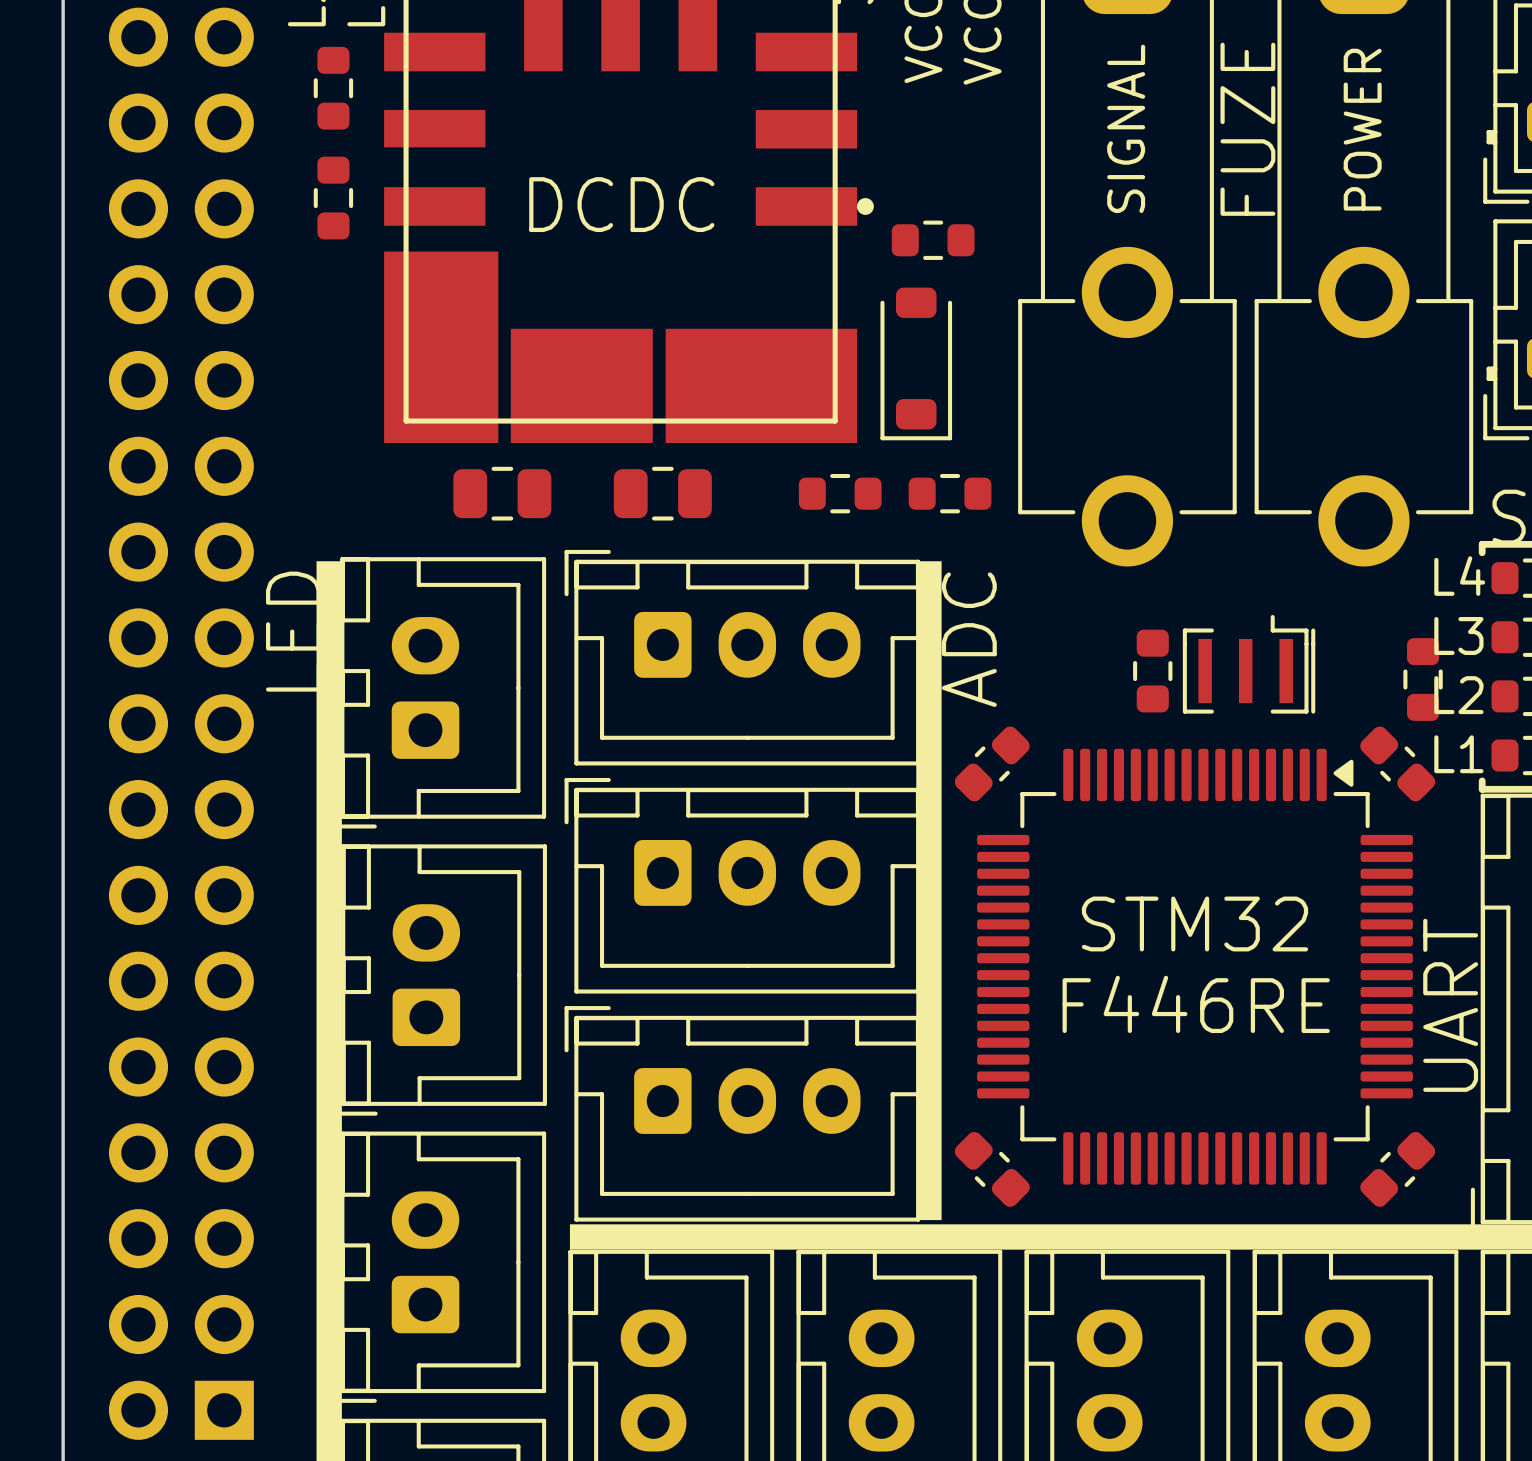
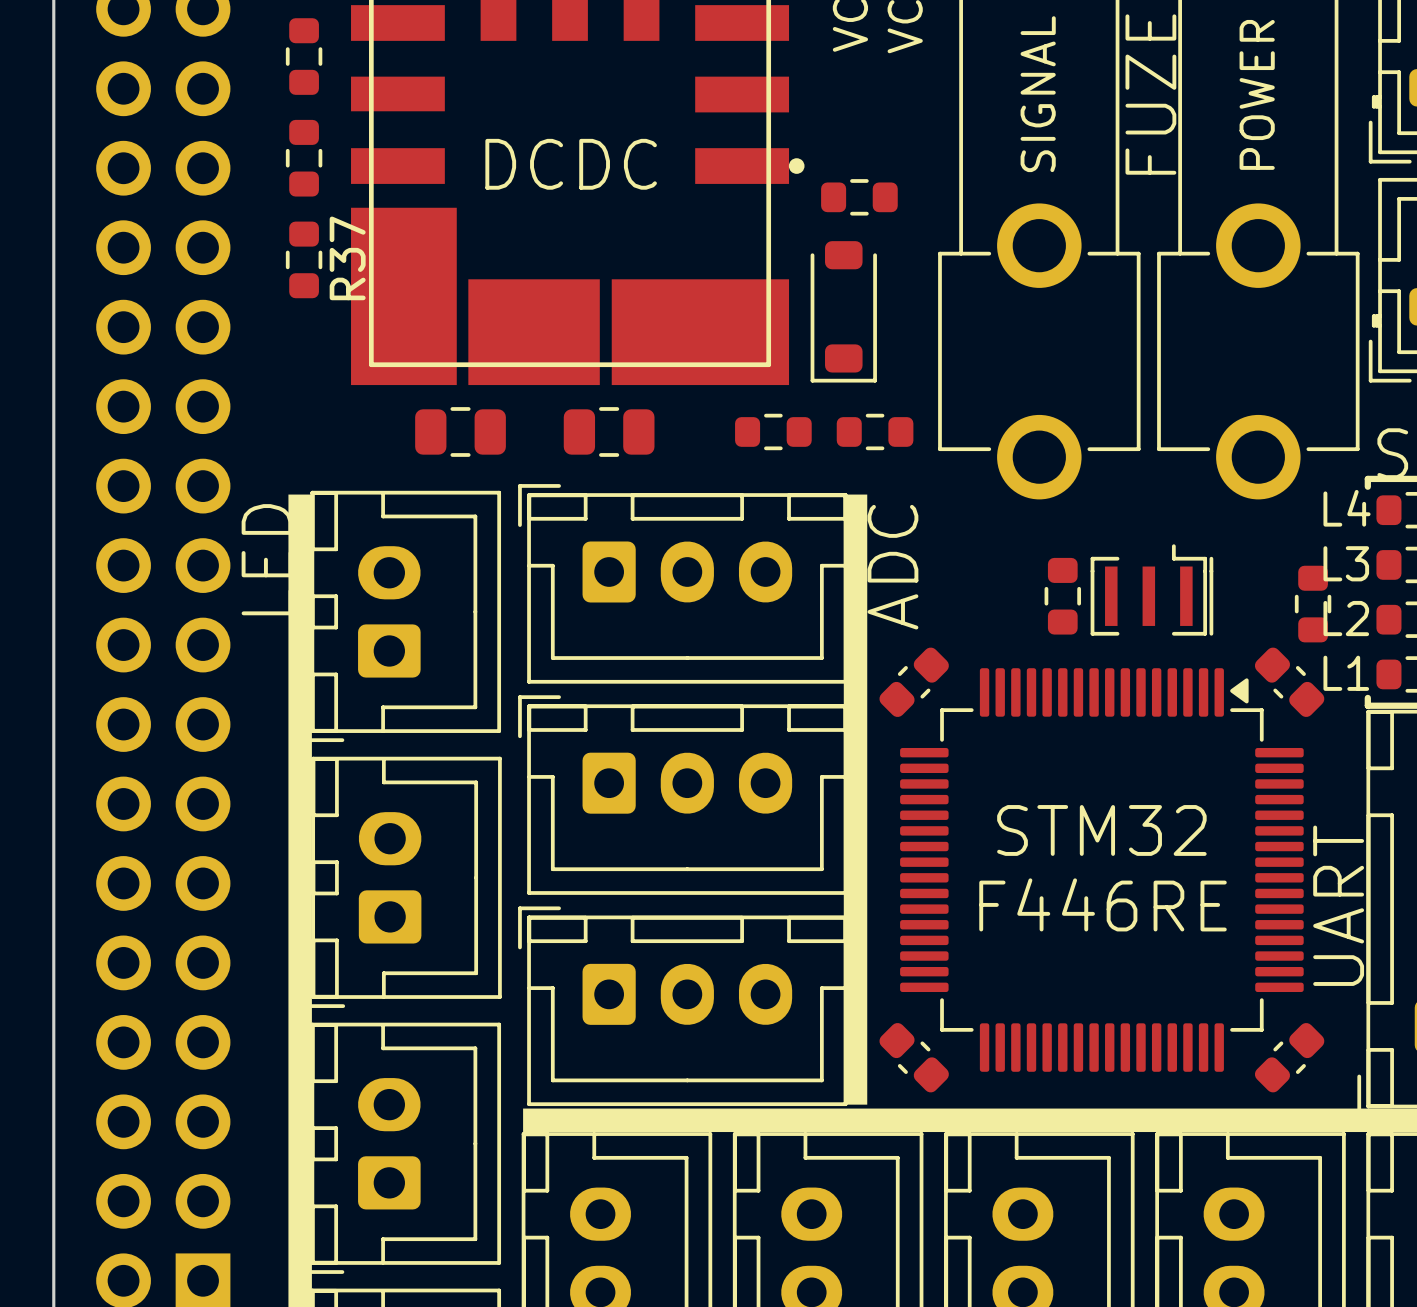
R37: none -> (304, 259)

